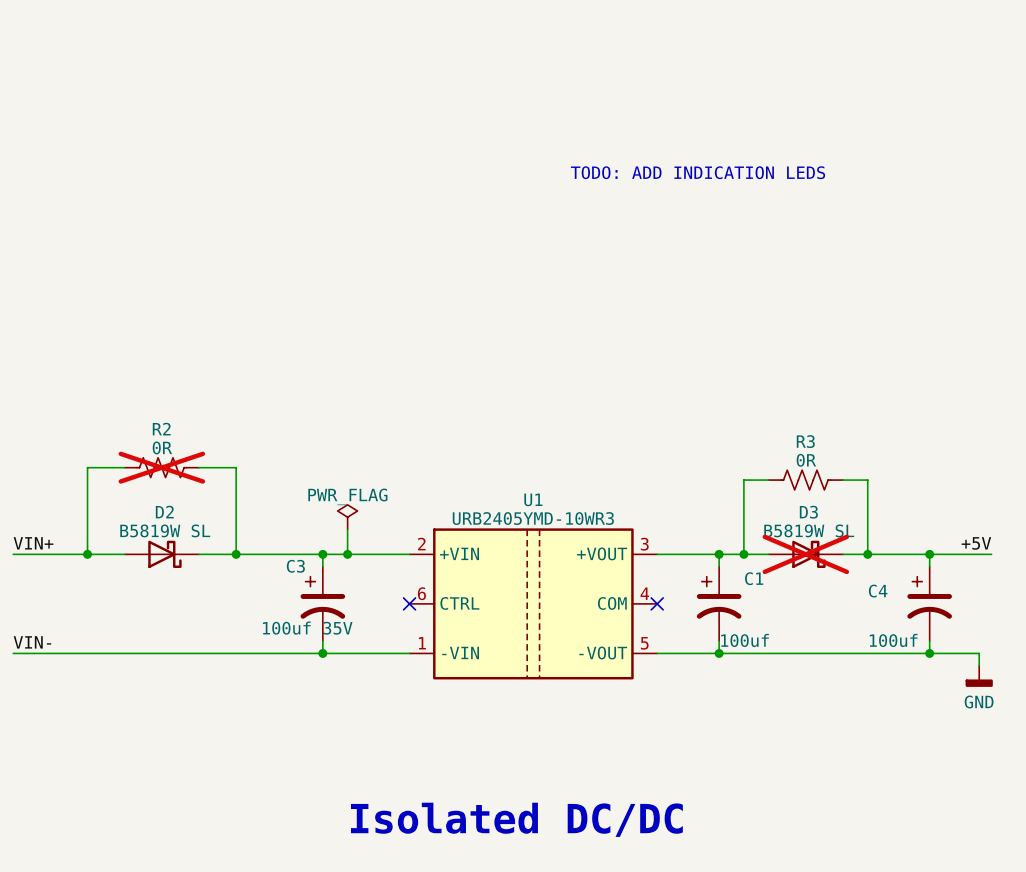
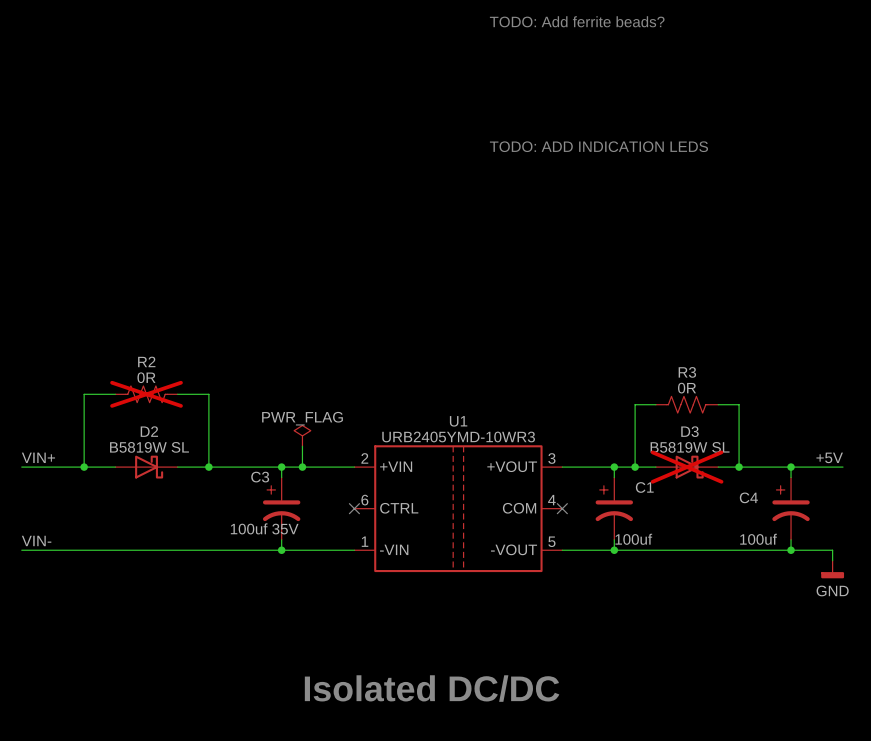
text: none -> TODO: Add ferrite beads? (577, 21)

